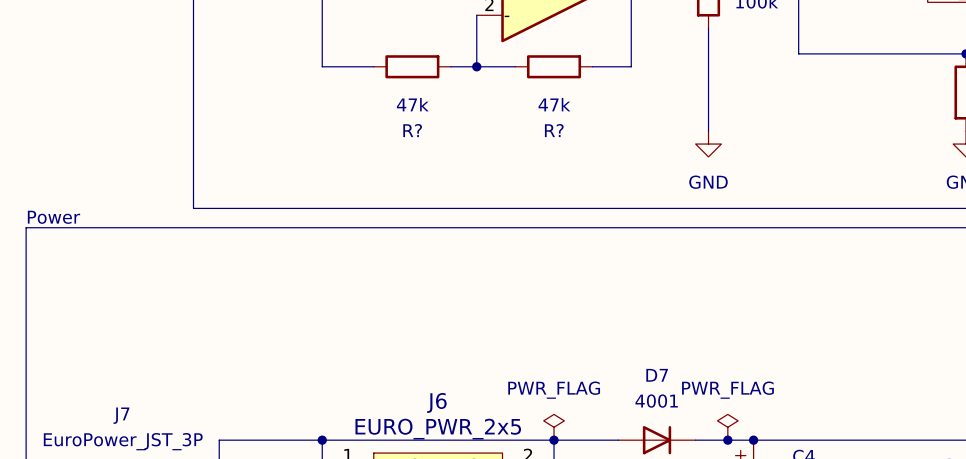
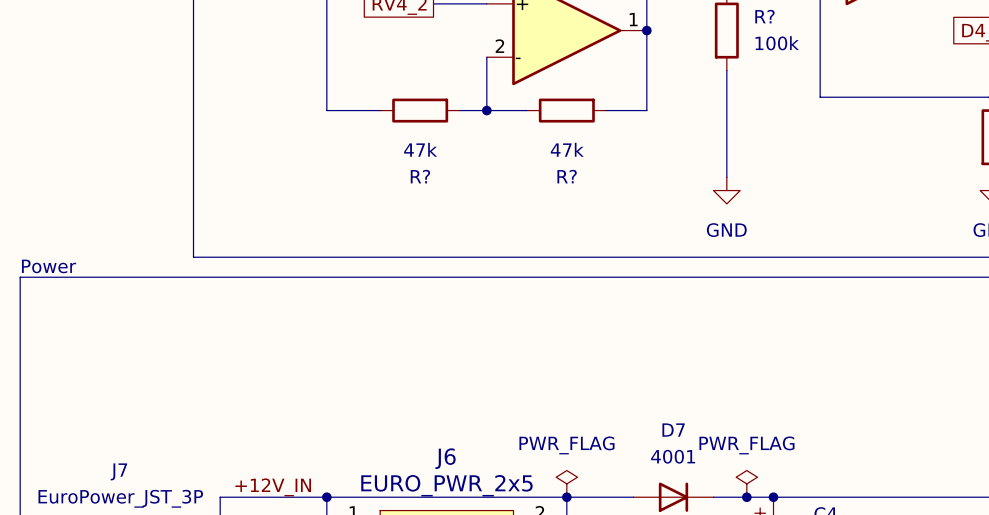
label: none -> +12V_IN (273, 487)

